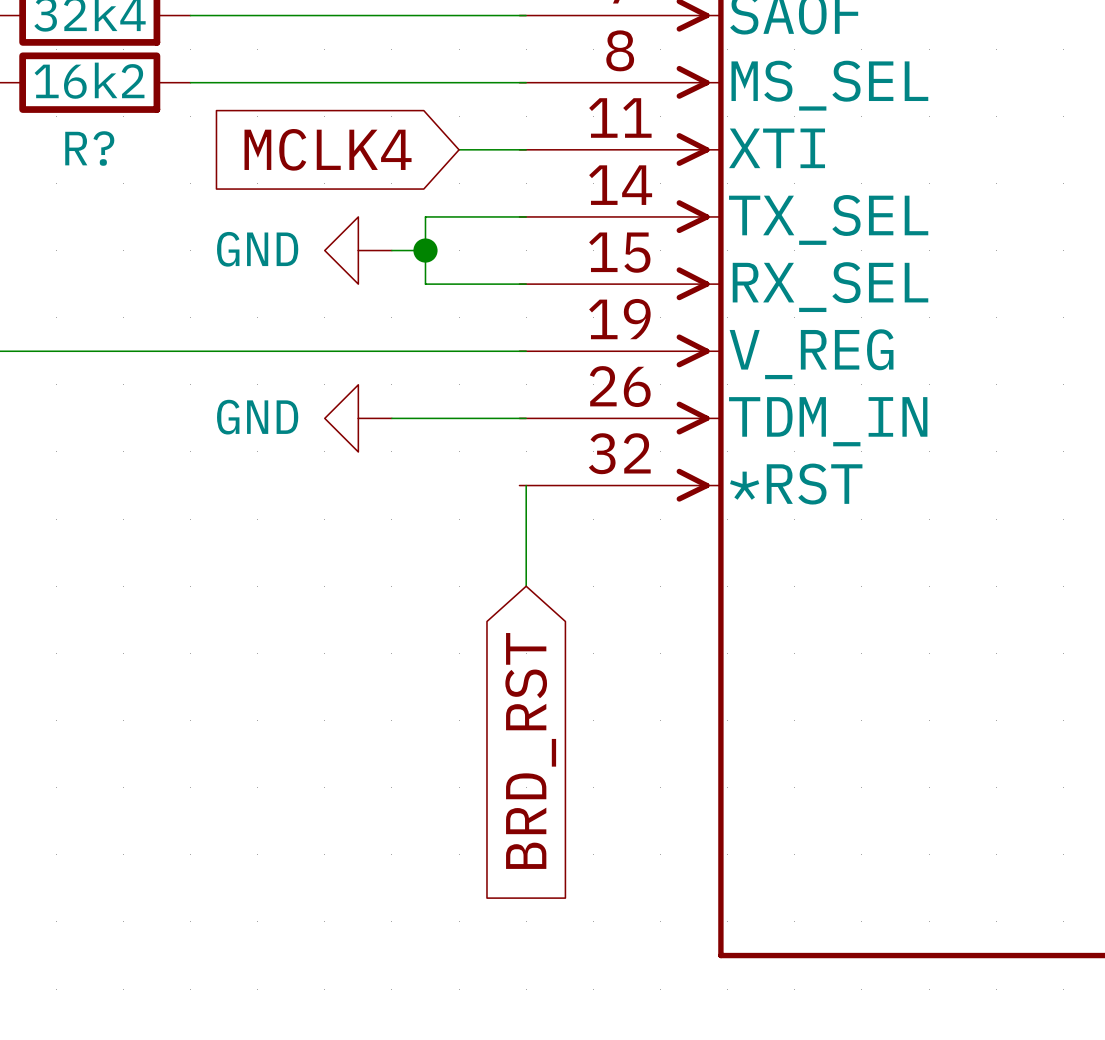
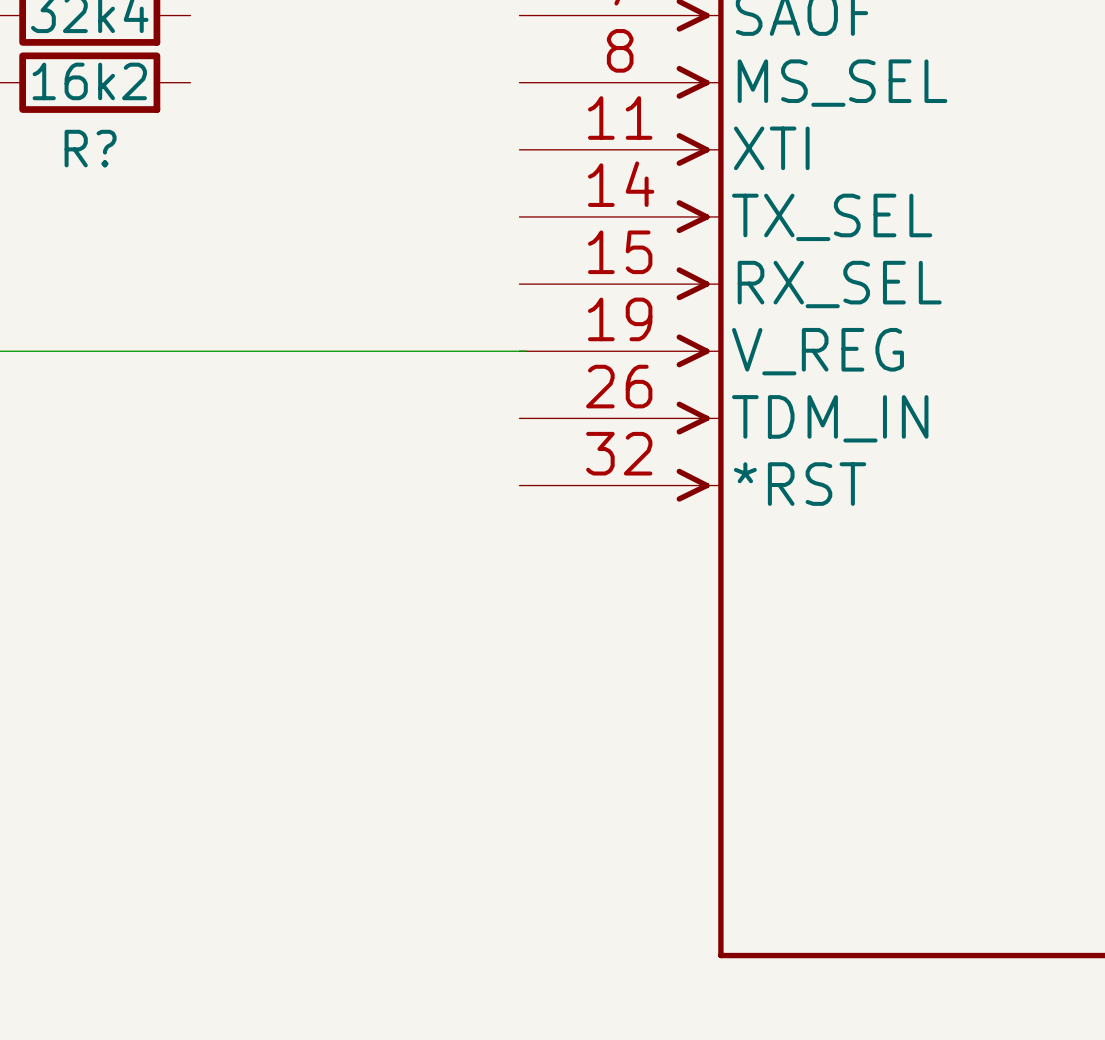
wire: (190, 15) (526, 15) -> none
wire: (190, 82) (526, 82) -> none
global label: MCLK4 (328, 149) -> none
wire: (459, 149) (526, 149) -> none
wire: (526, 216) (425, 216) (425, 284) (526, 284) -> none
power symbol: GND (358, 250) -> none
wire: (391, 250) (425, 250) -> none
junction: (425, 250) -> none
power symbol: GND (358, 418) -> none
wire: (391, 418) (526, 418) -> none
wire: (526, 485) (526, 586) -> none
global label: BRD_RST (530, 750) -> none

